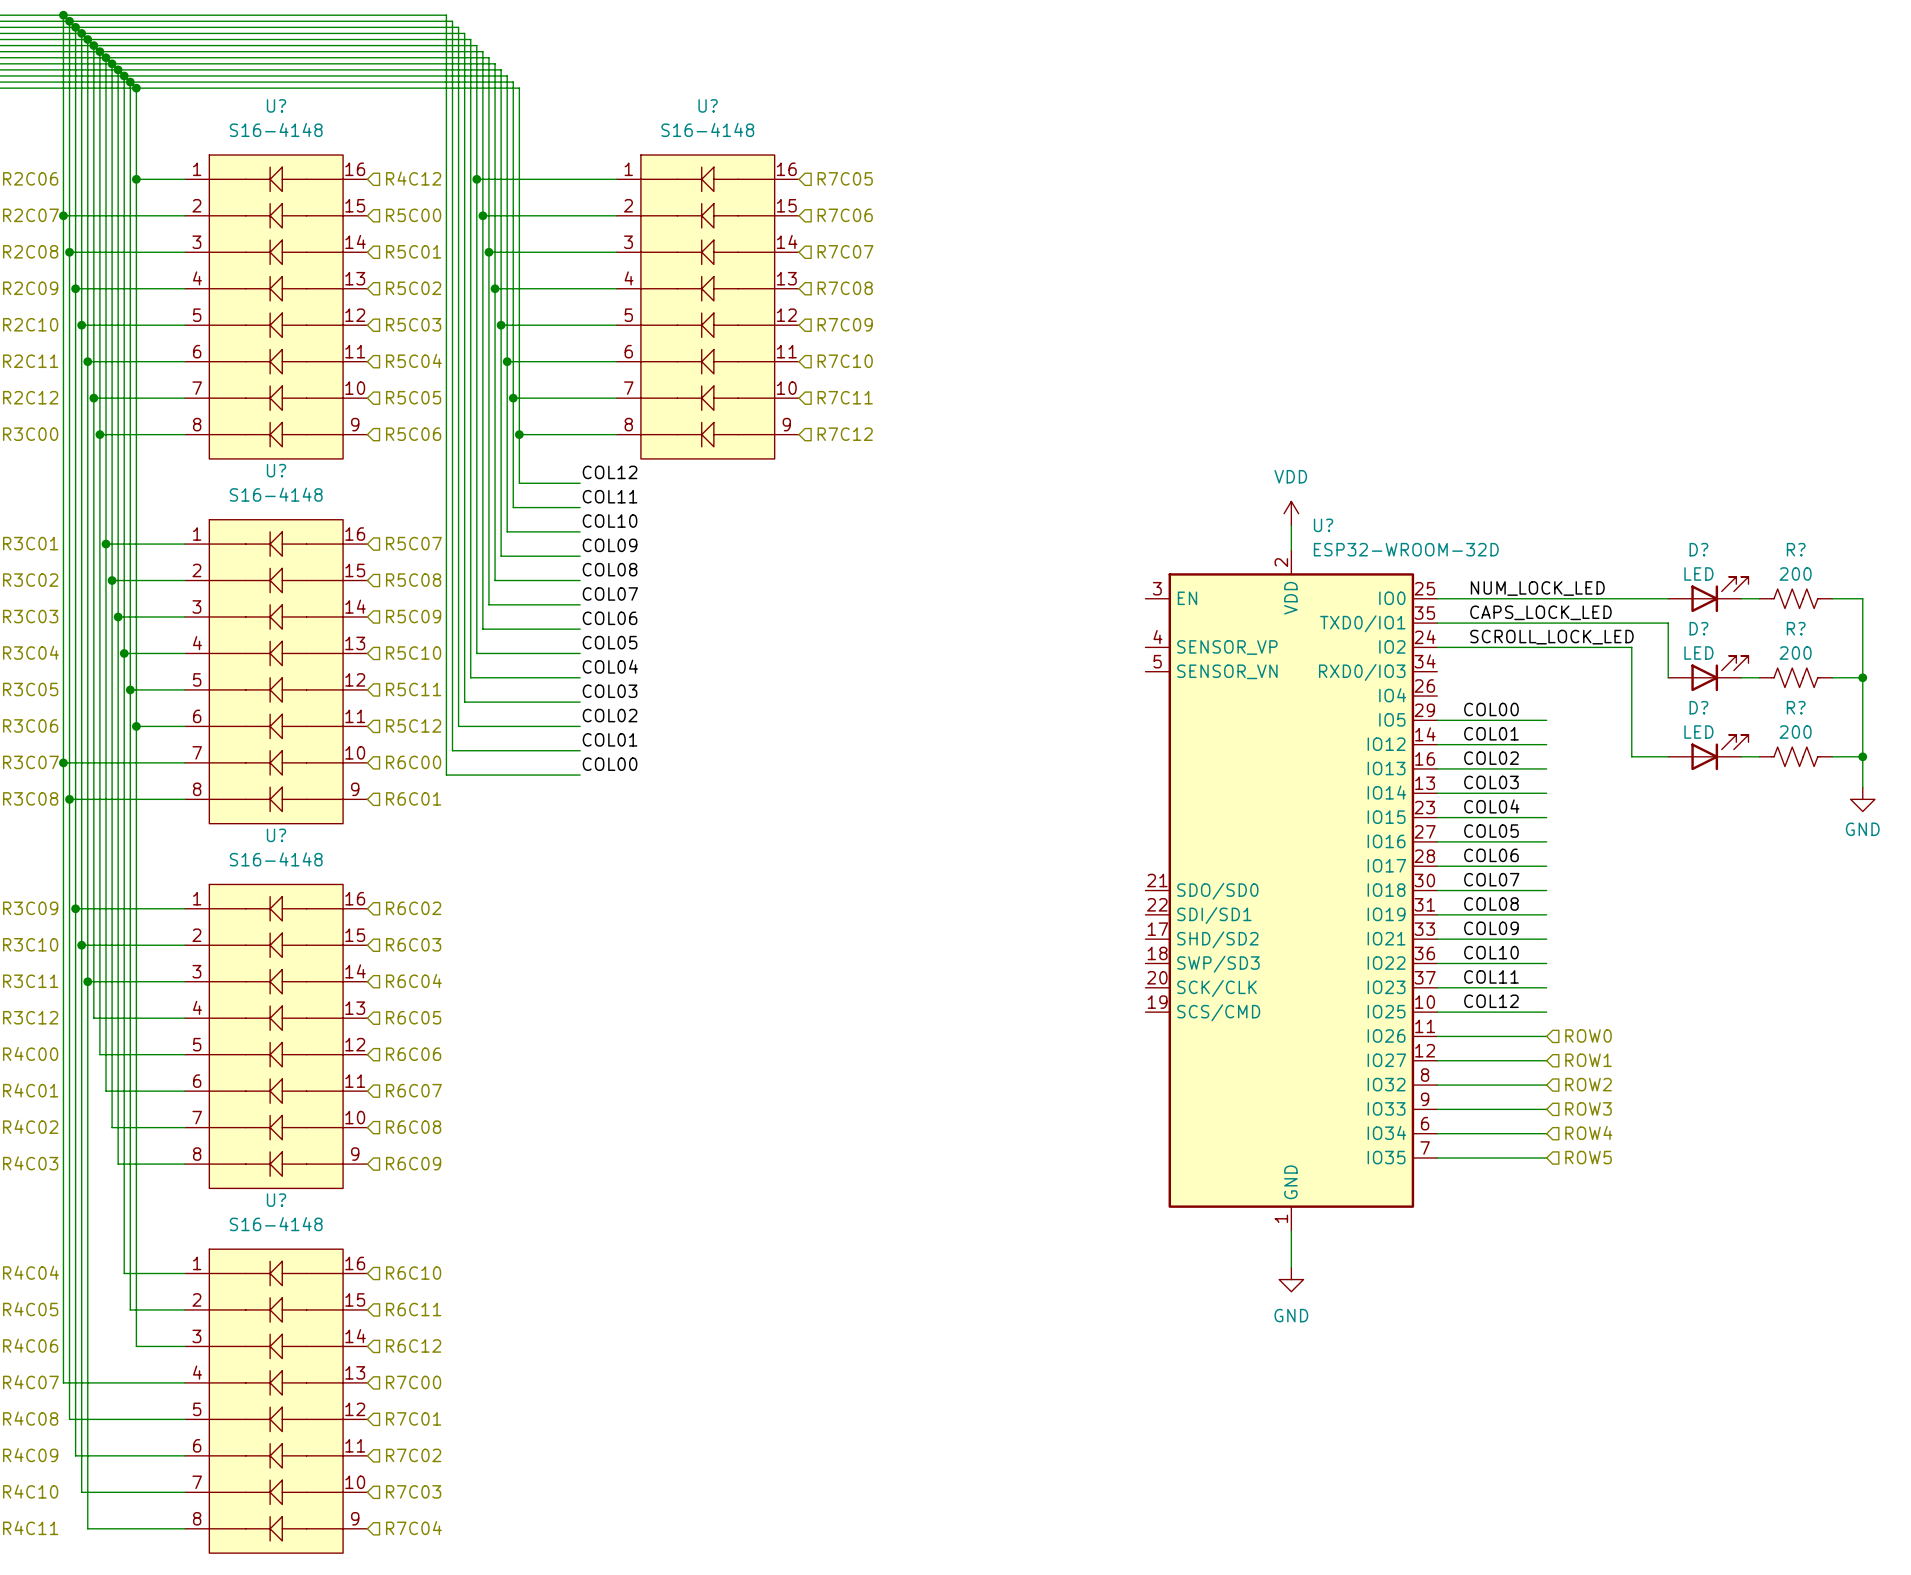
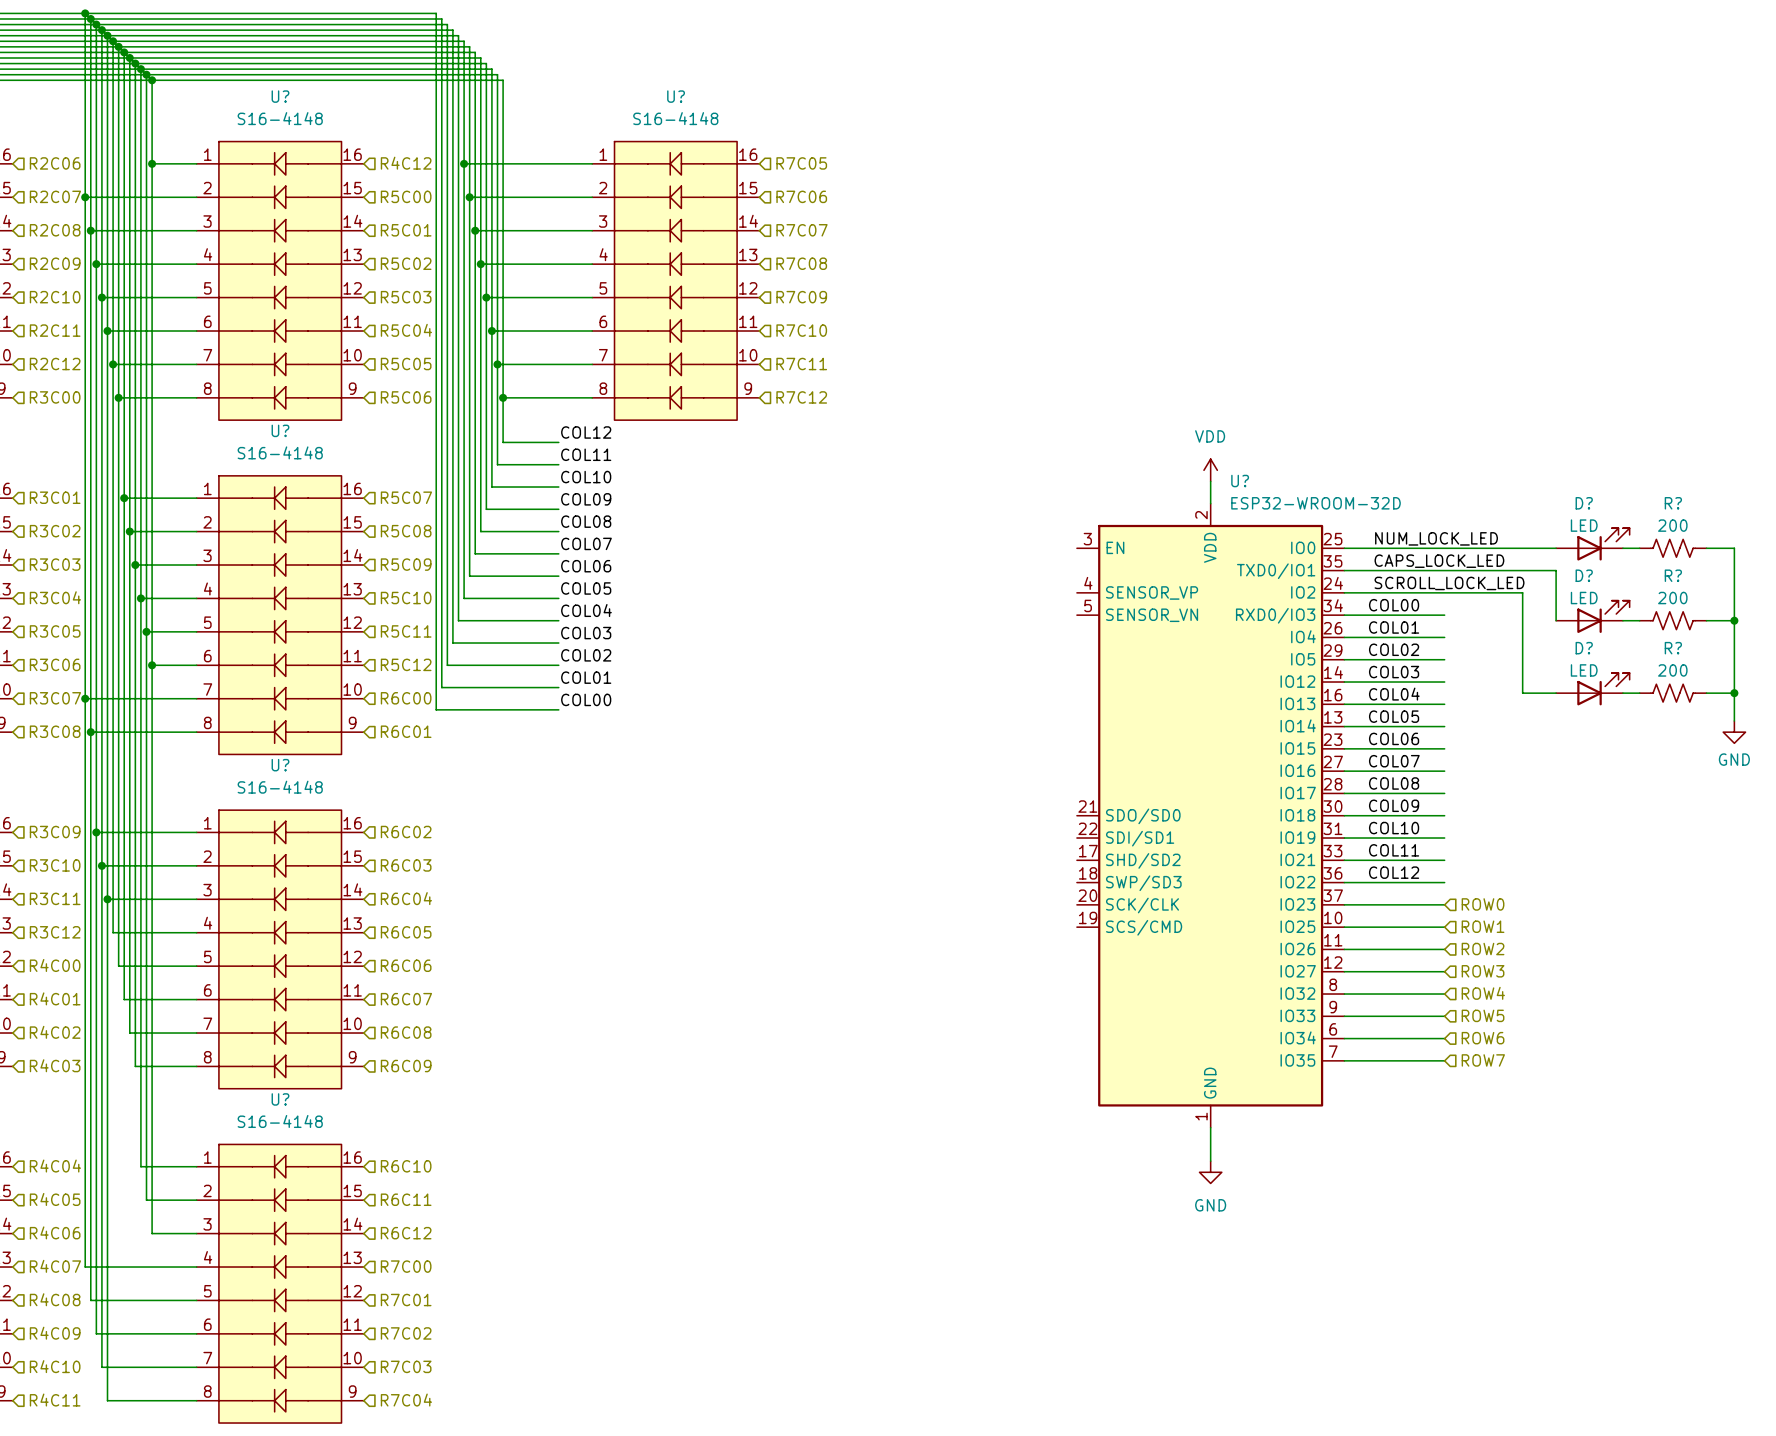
label: none -> COL00 (1394, 605)
wire: none -> (1344, 615) (1444, 615)
label: none -> COL01 (1394, 627)
wire: none -> (1344, 637) (1444, 637)
label: COL00 (1491, 709) -> COL02 (1394, 649)
label: COL01 (1491, 733) -> COL03 (1394, 672)
label: COL02 (1491, 758) -> COL04 (1394, 694)
label: COL03 (1491, 782) -> COL05 (1394, 716)
label: COL04 (1491, 806) -> COL06 (1394, 738)
label: COL05 (1491, 831) -> COL07 (1394, 761)
label: COL06 (1491, 855) -> COL08 (1394, 783)
label: COL07 (1491, 879) -> COL09 (1394, 805)
label: COL08 (1491, 904) -> COL10 (1394, 828)
label: COL09 (1491, 928) -> COL11 (1394, 850)
label: COL10 (1491, 952) -> COL12 (1394, 872)
label: COL11 (1491, 976) -> none
hierarchical label: none -> ROW0 (1483, 904)
label: COL12 (1491, 1001) -> none
hierarchical label: none -> ROW1 (1483, 926)
hierarchical label: ROW0 (1588, 1035) -> ROW2 (1483, 949)
hierarchical label: ROW1 (1588, 1060) -> ROW3 (1483, 971)
hierarchical label: ROW2 (1588, 1084) -> ROW4 (1483, 993)
hierarchical label: ROW3 (1588, 1108) -> ROW5 (1483, 1015)
hierarchical label: ROW4 (1588, 1132) -> ROW6 (1483, 1038)
hierarchical label: ROW5 (1588, 1157) -> ROW7 (1483, 1060)

